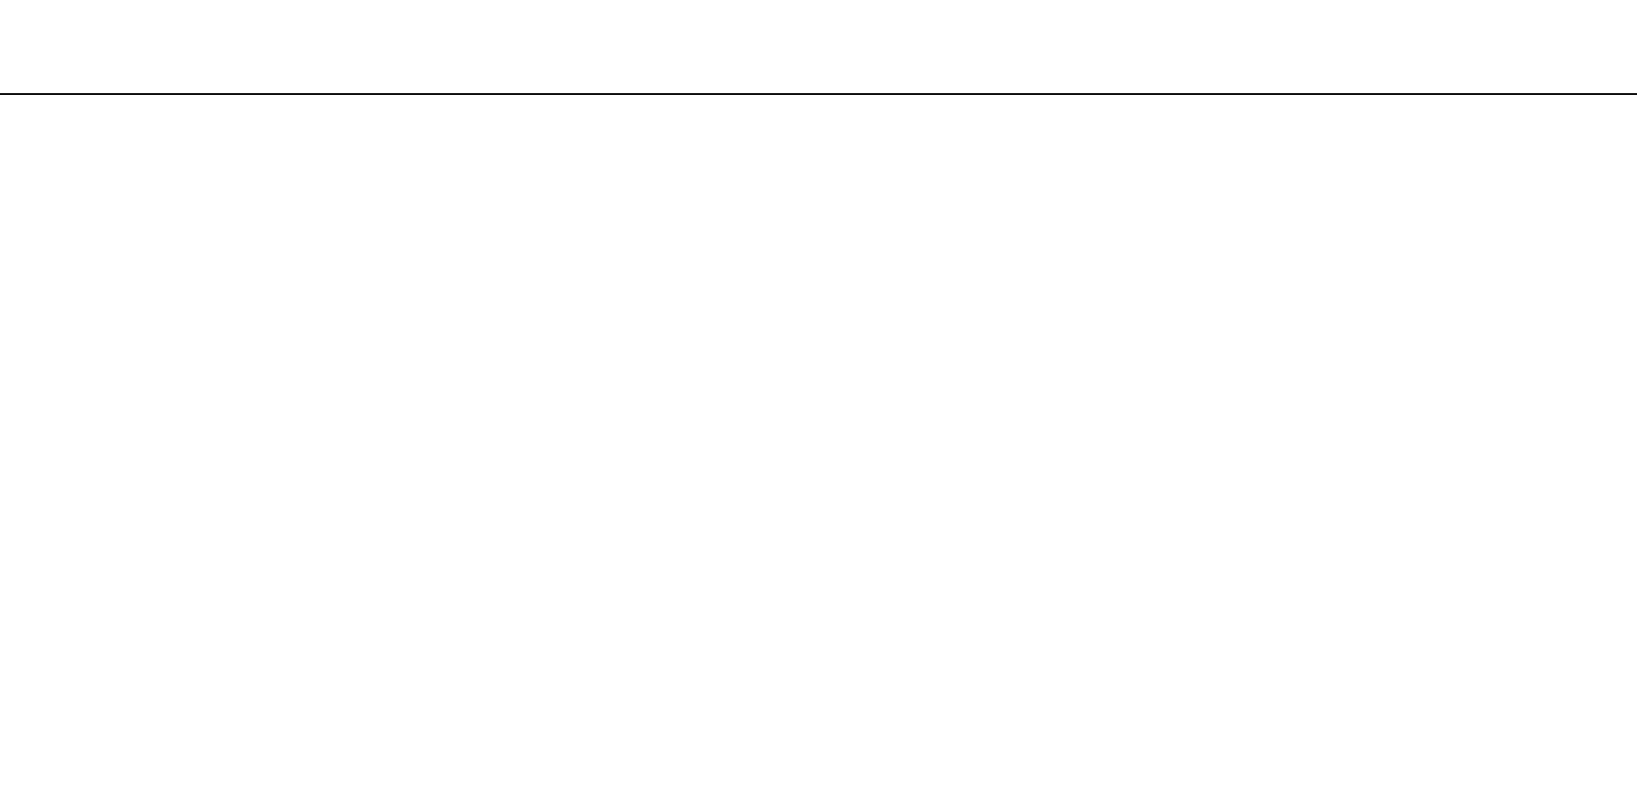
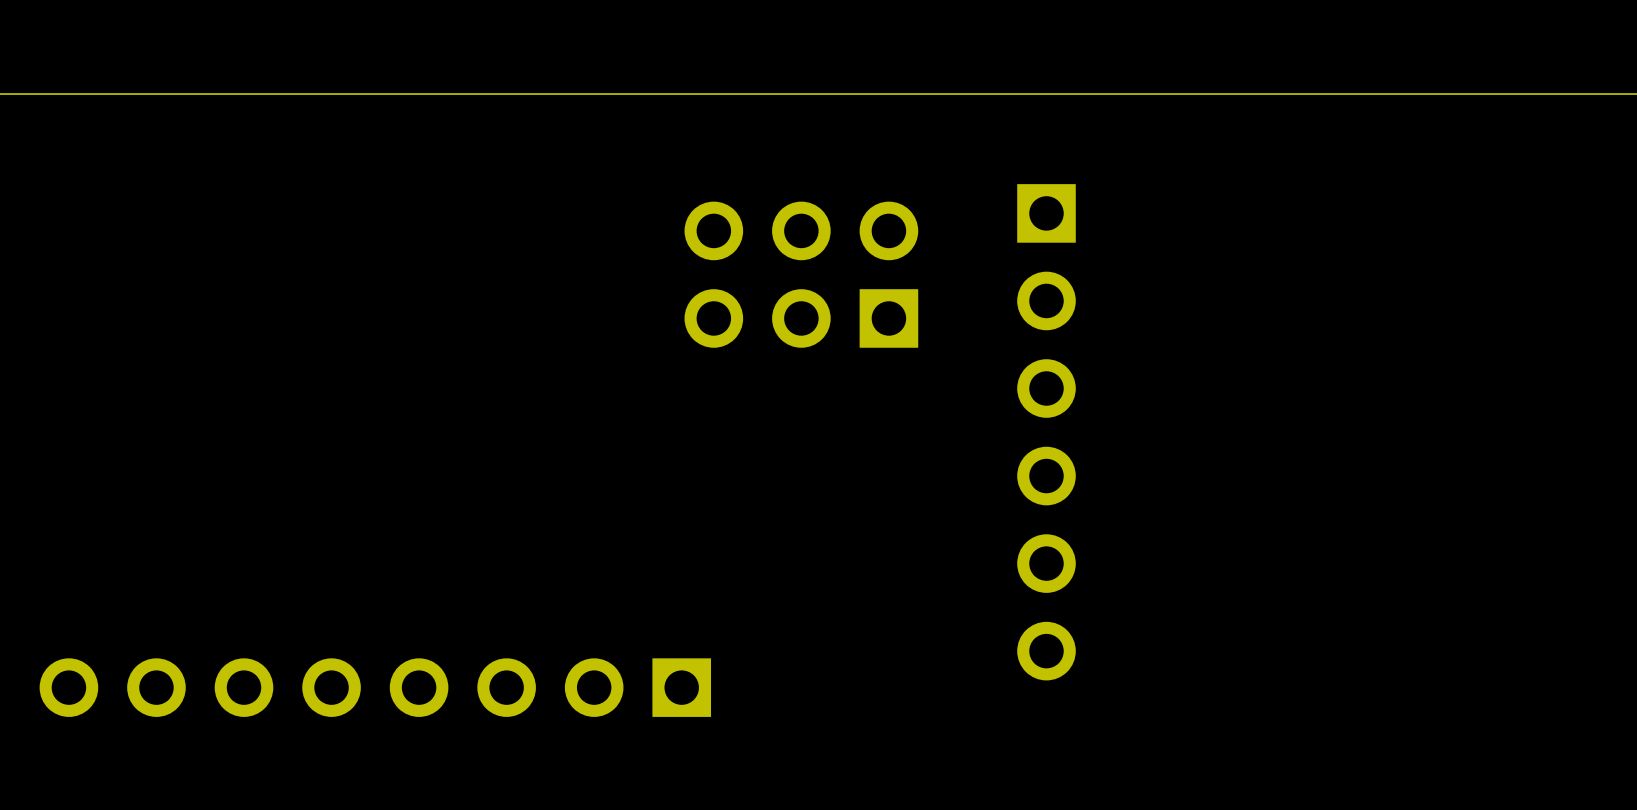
part: none -> (801, 274)
part: none -> (1046, 432)
part: none -> (375, 687)

